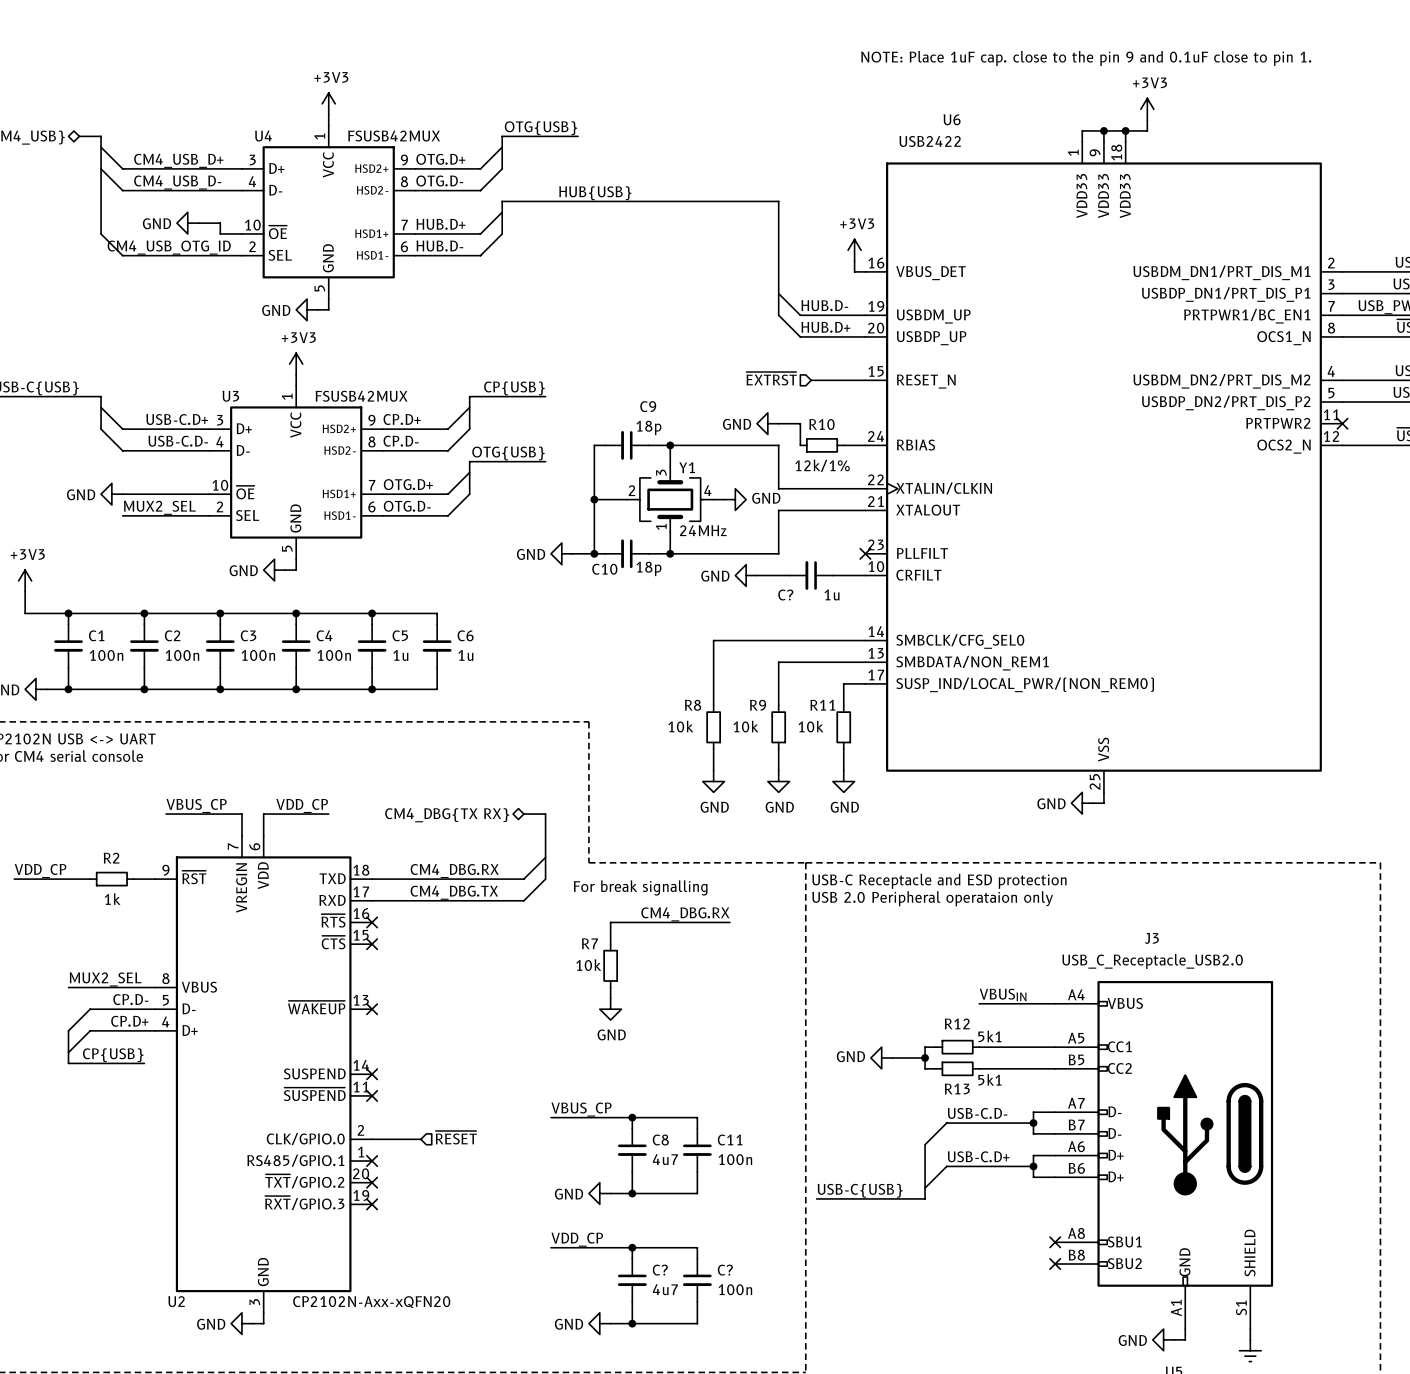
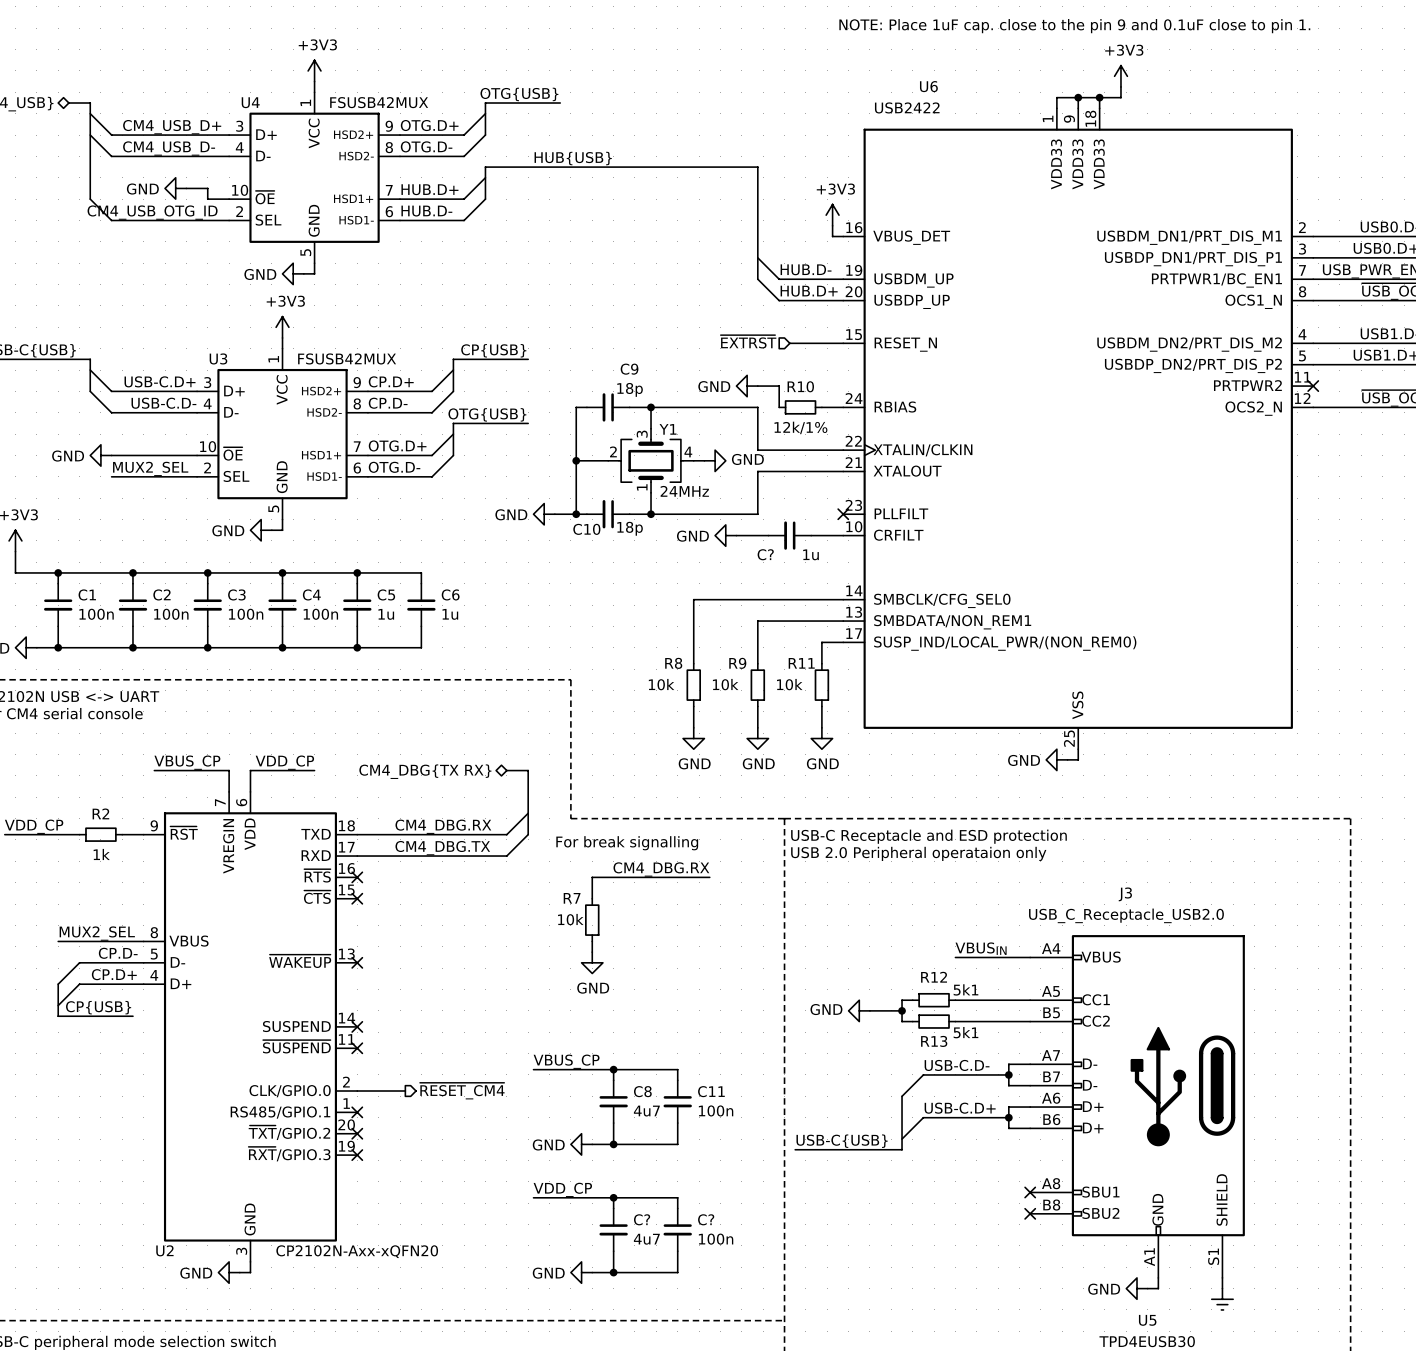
hierarchical label shape: input (456, 1137) -> output (462, 1091)
hierarchical label: ~{RESET} (456, 1137) -> ~{RESET_CM4} (462, 1091)

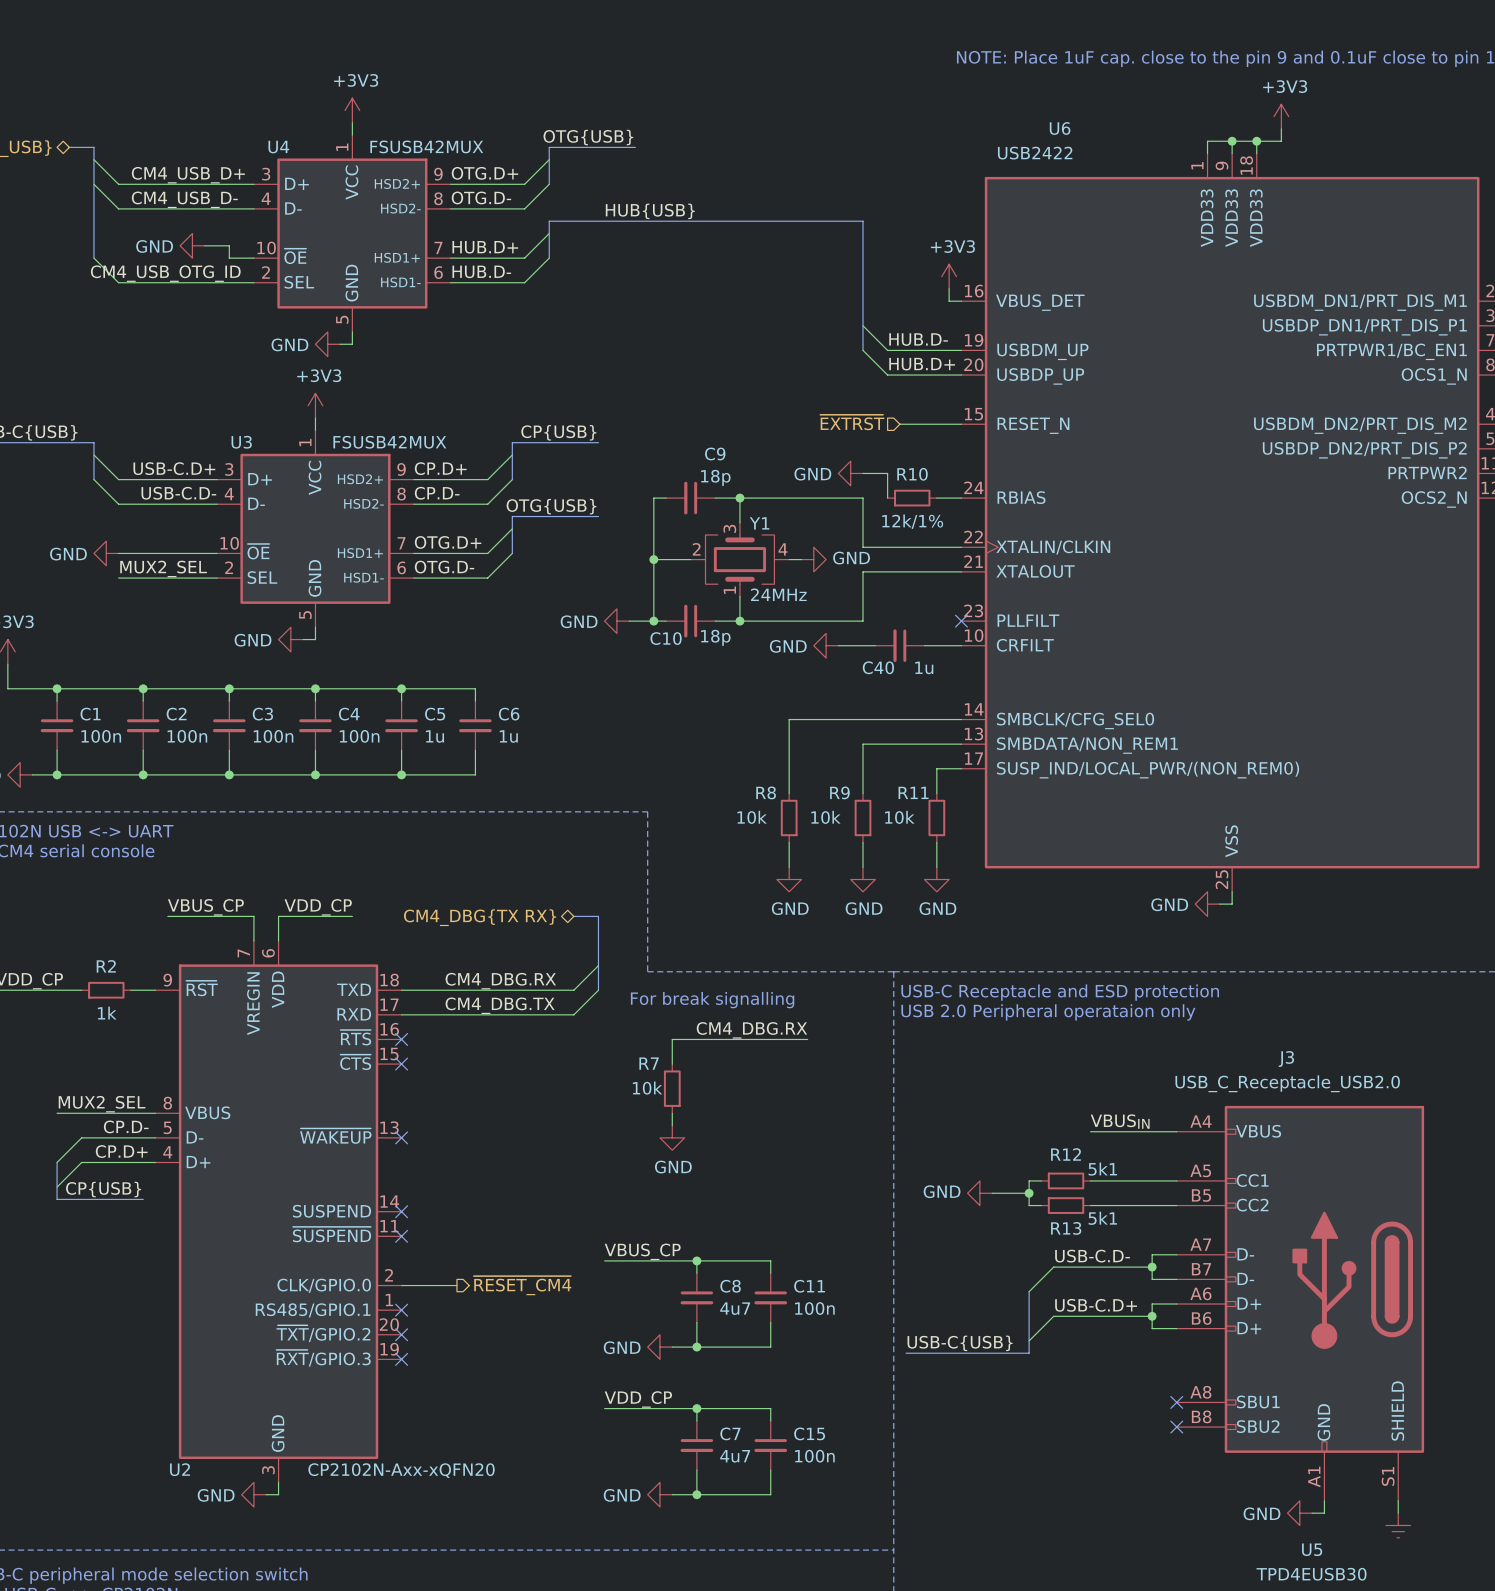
C? name: C? (765, 554) -> C40 (878, 667)
C? name: C? (642, 1219) -> C7 (730, 1433)
C? name: C? (706, 1219) -> C15 (809, 1433)

